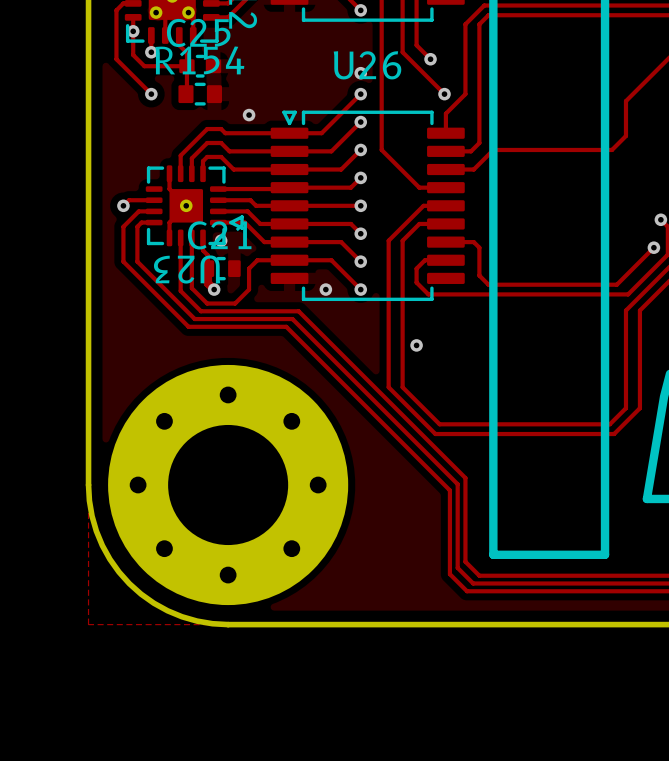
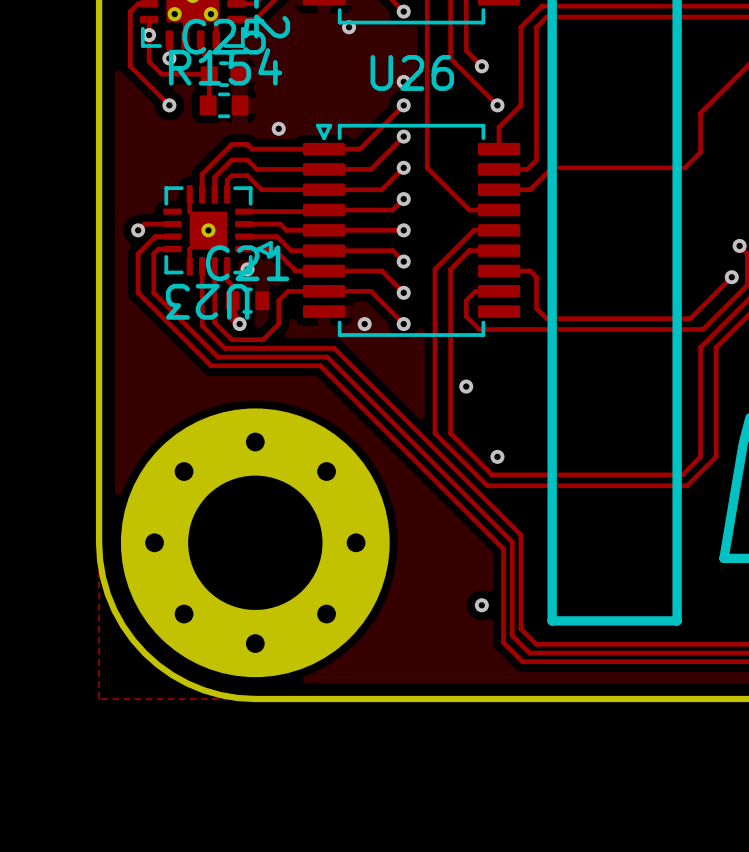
via: none -> (349, 27)
via: none -> (497, 456)
via: none -> (481, 605)

